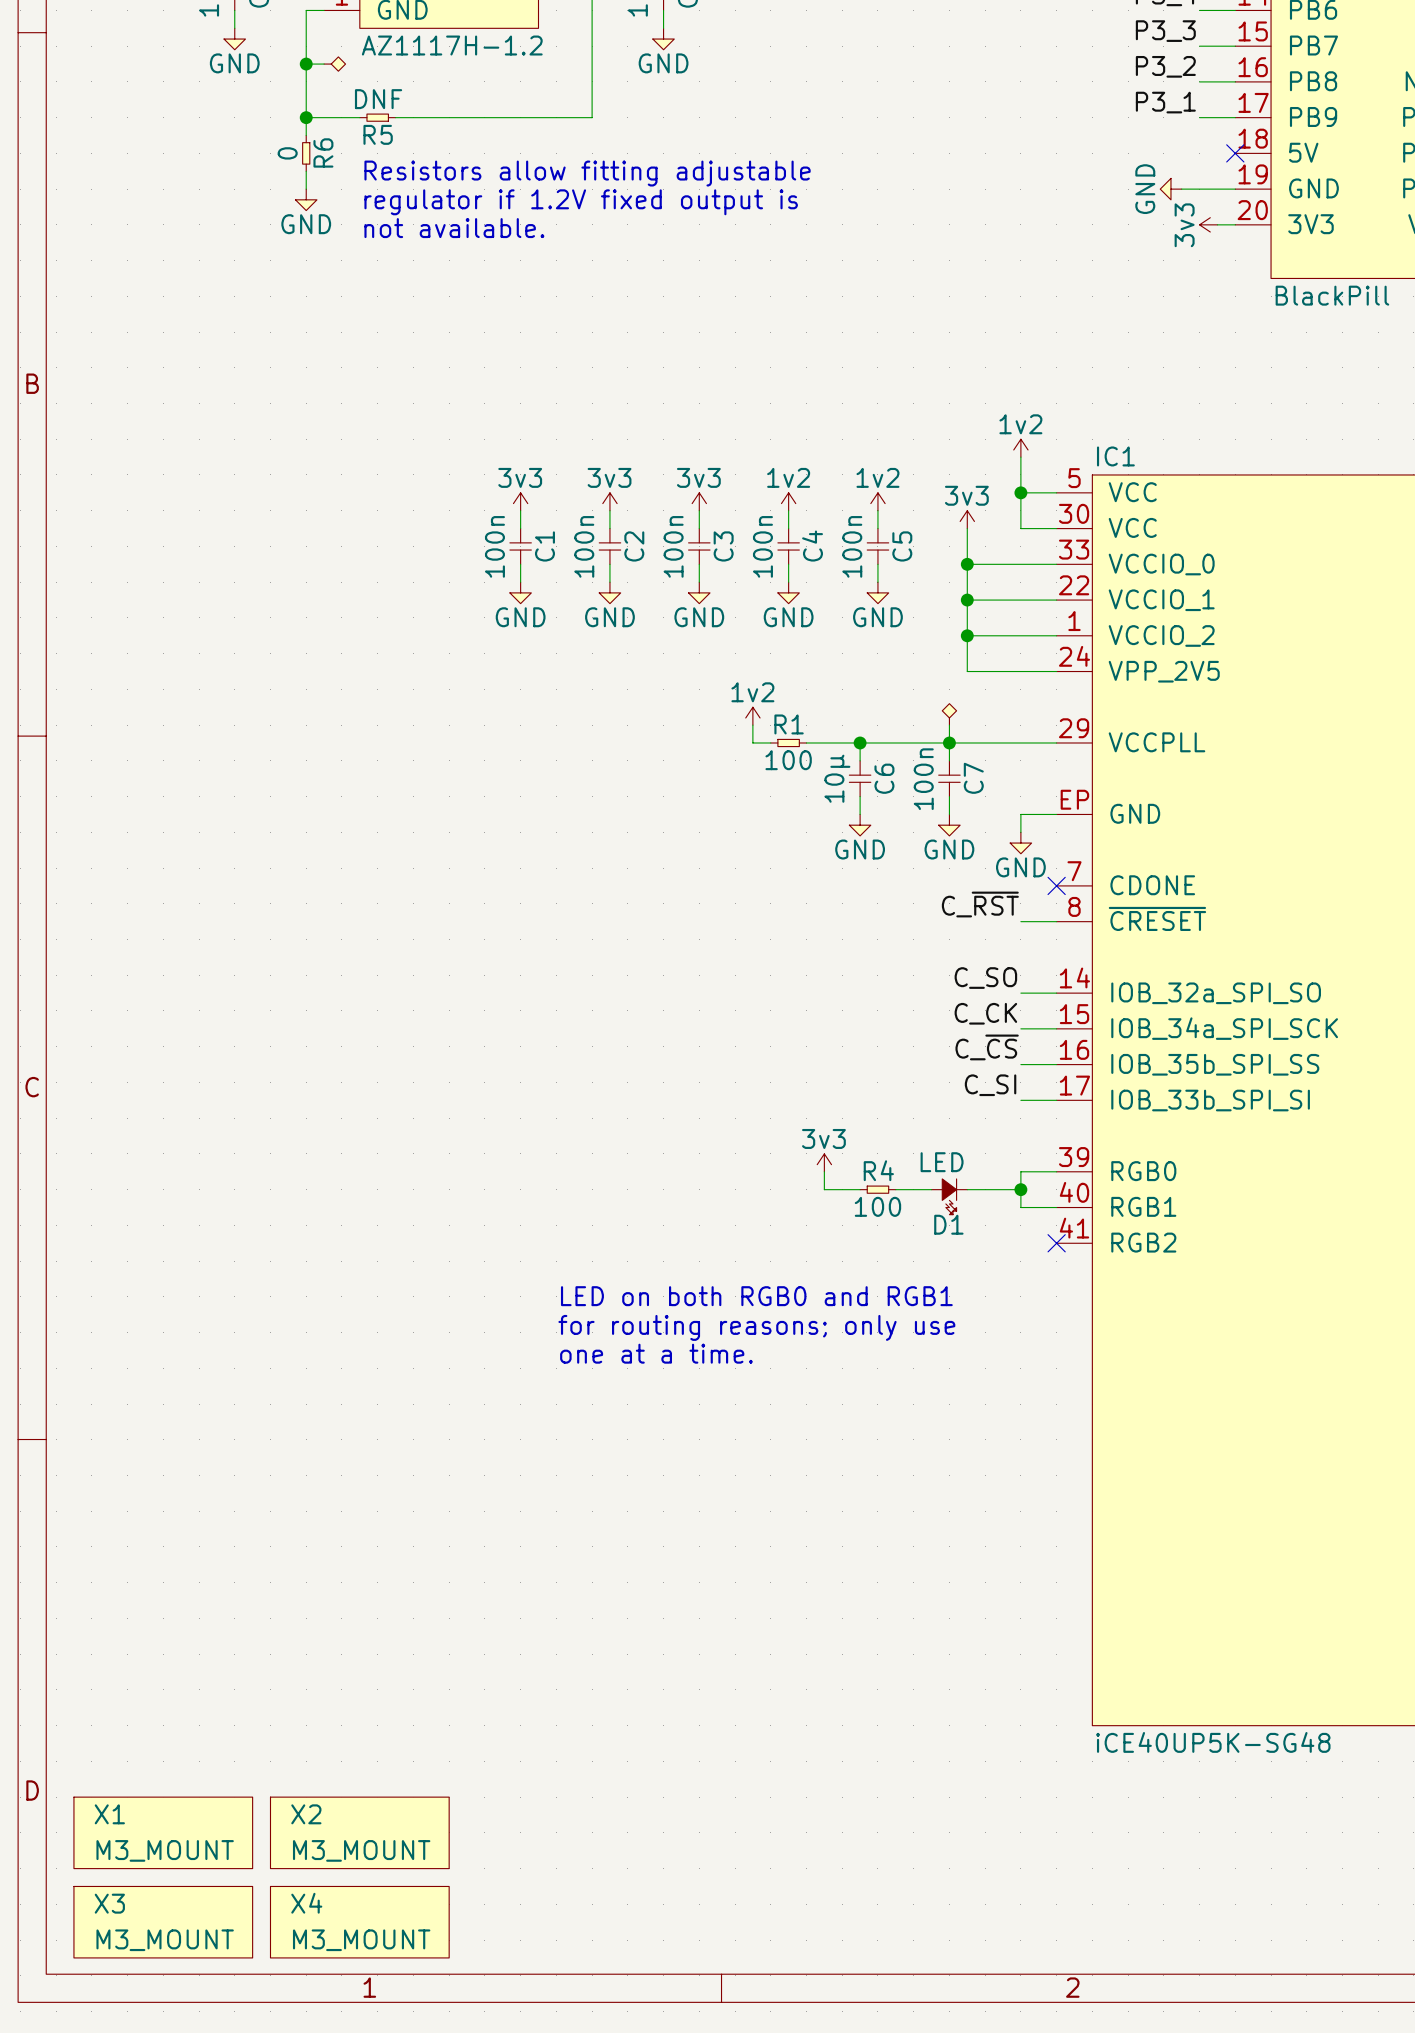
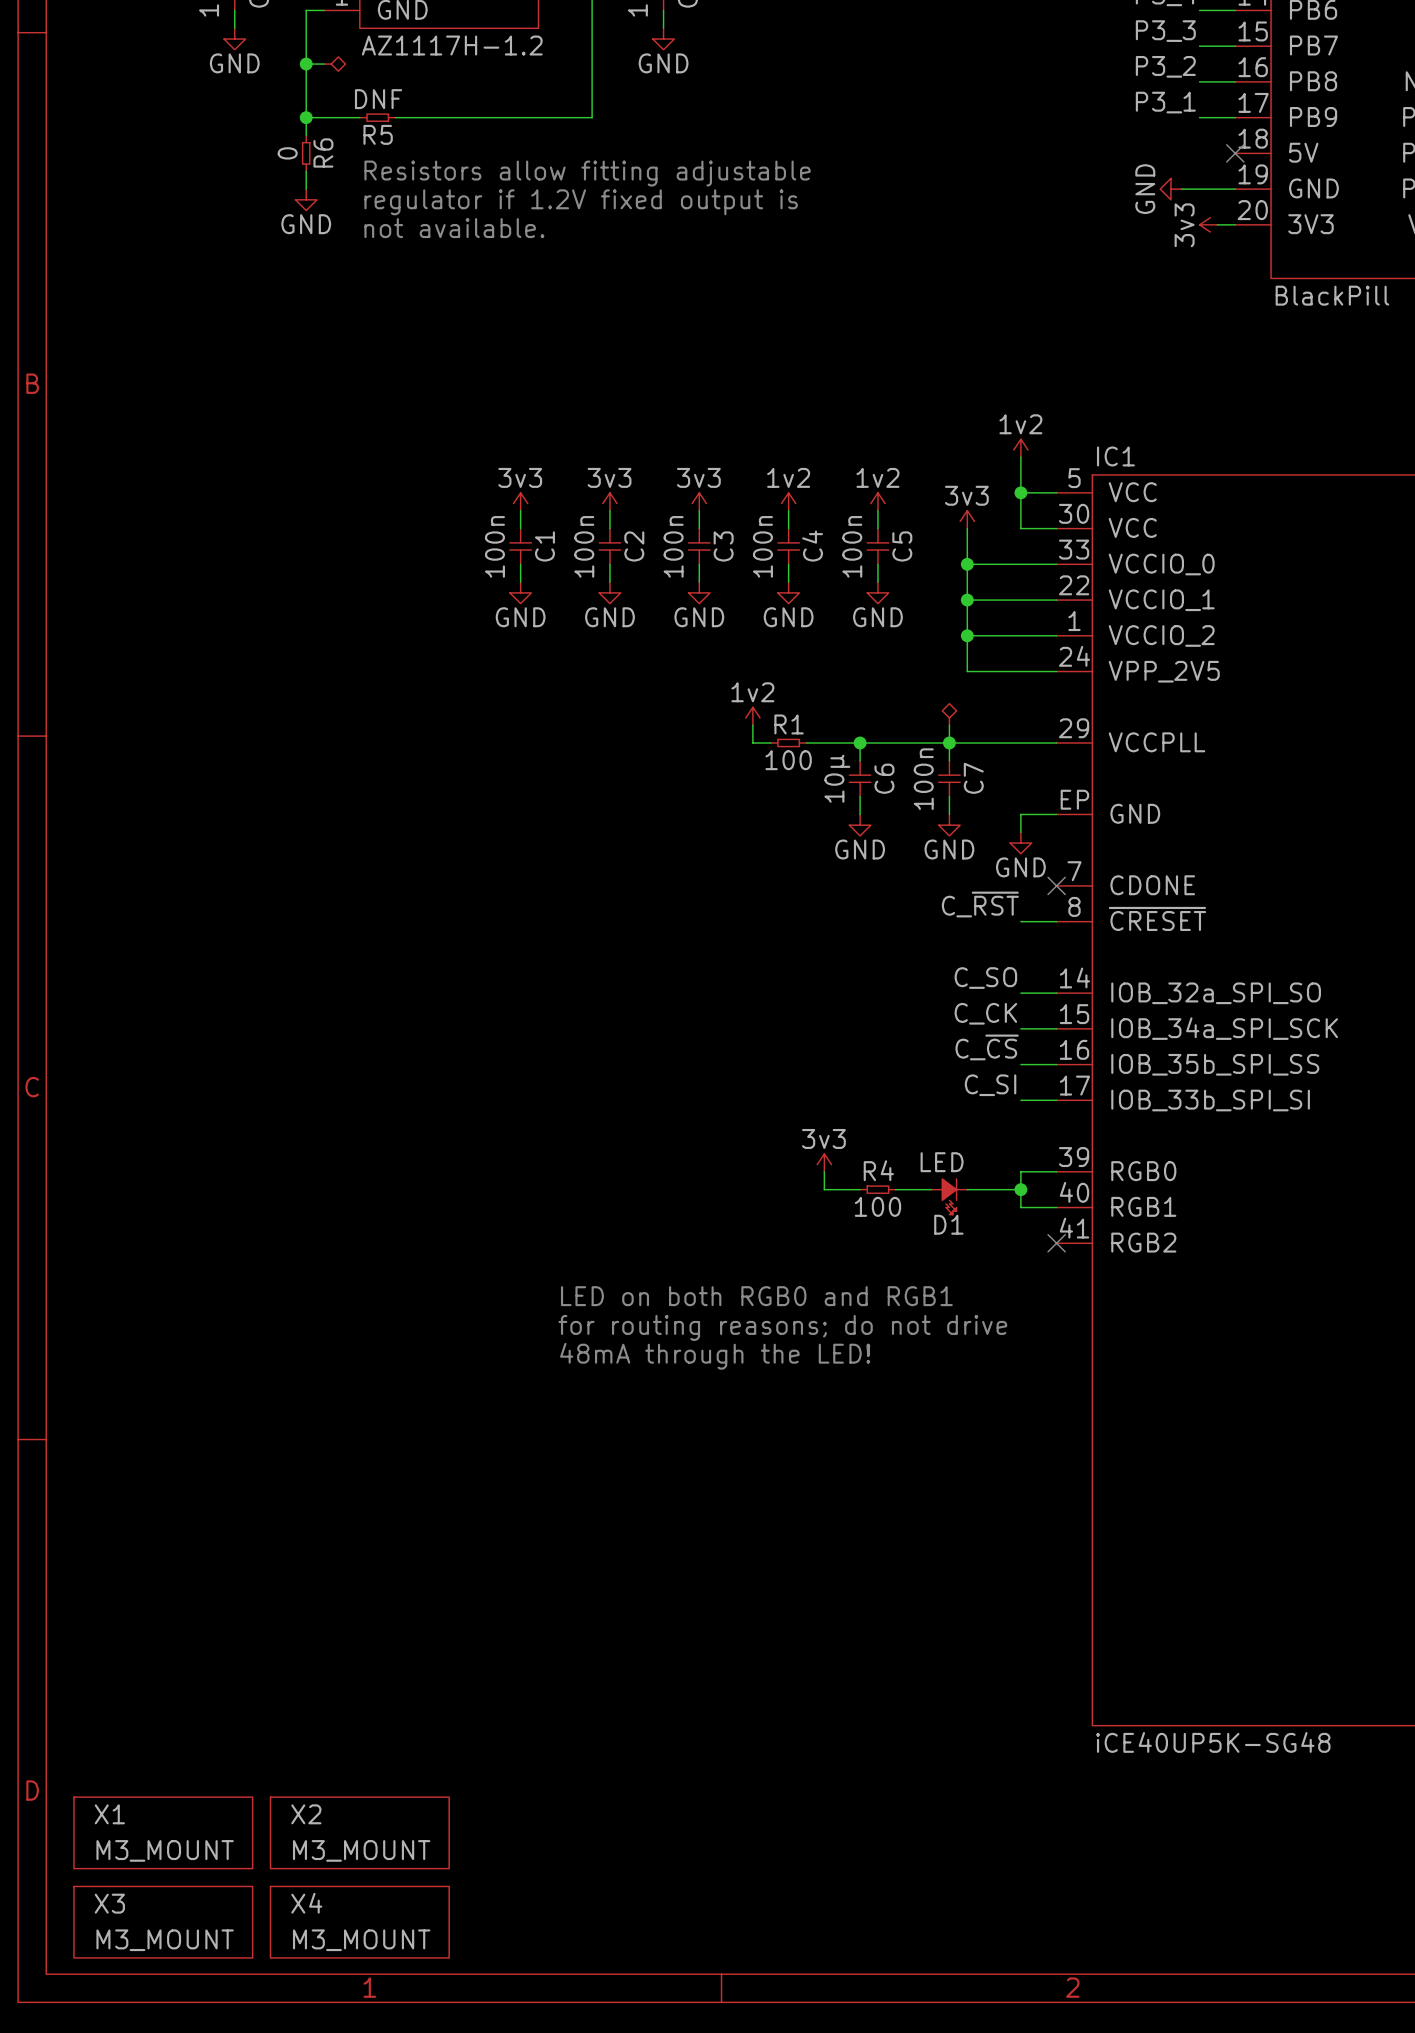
text: for routing reasons; only use (756, 1327) -> for routing reasons; do not drive (782, 1327)
text: one at a time. (656, 1353) -> 48mA through the LED! (715, 1356)

